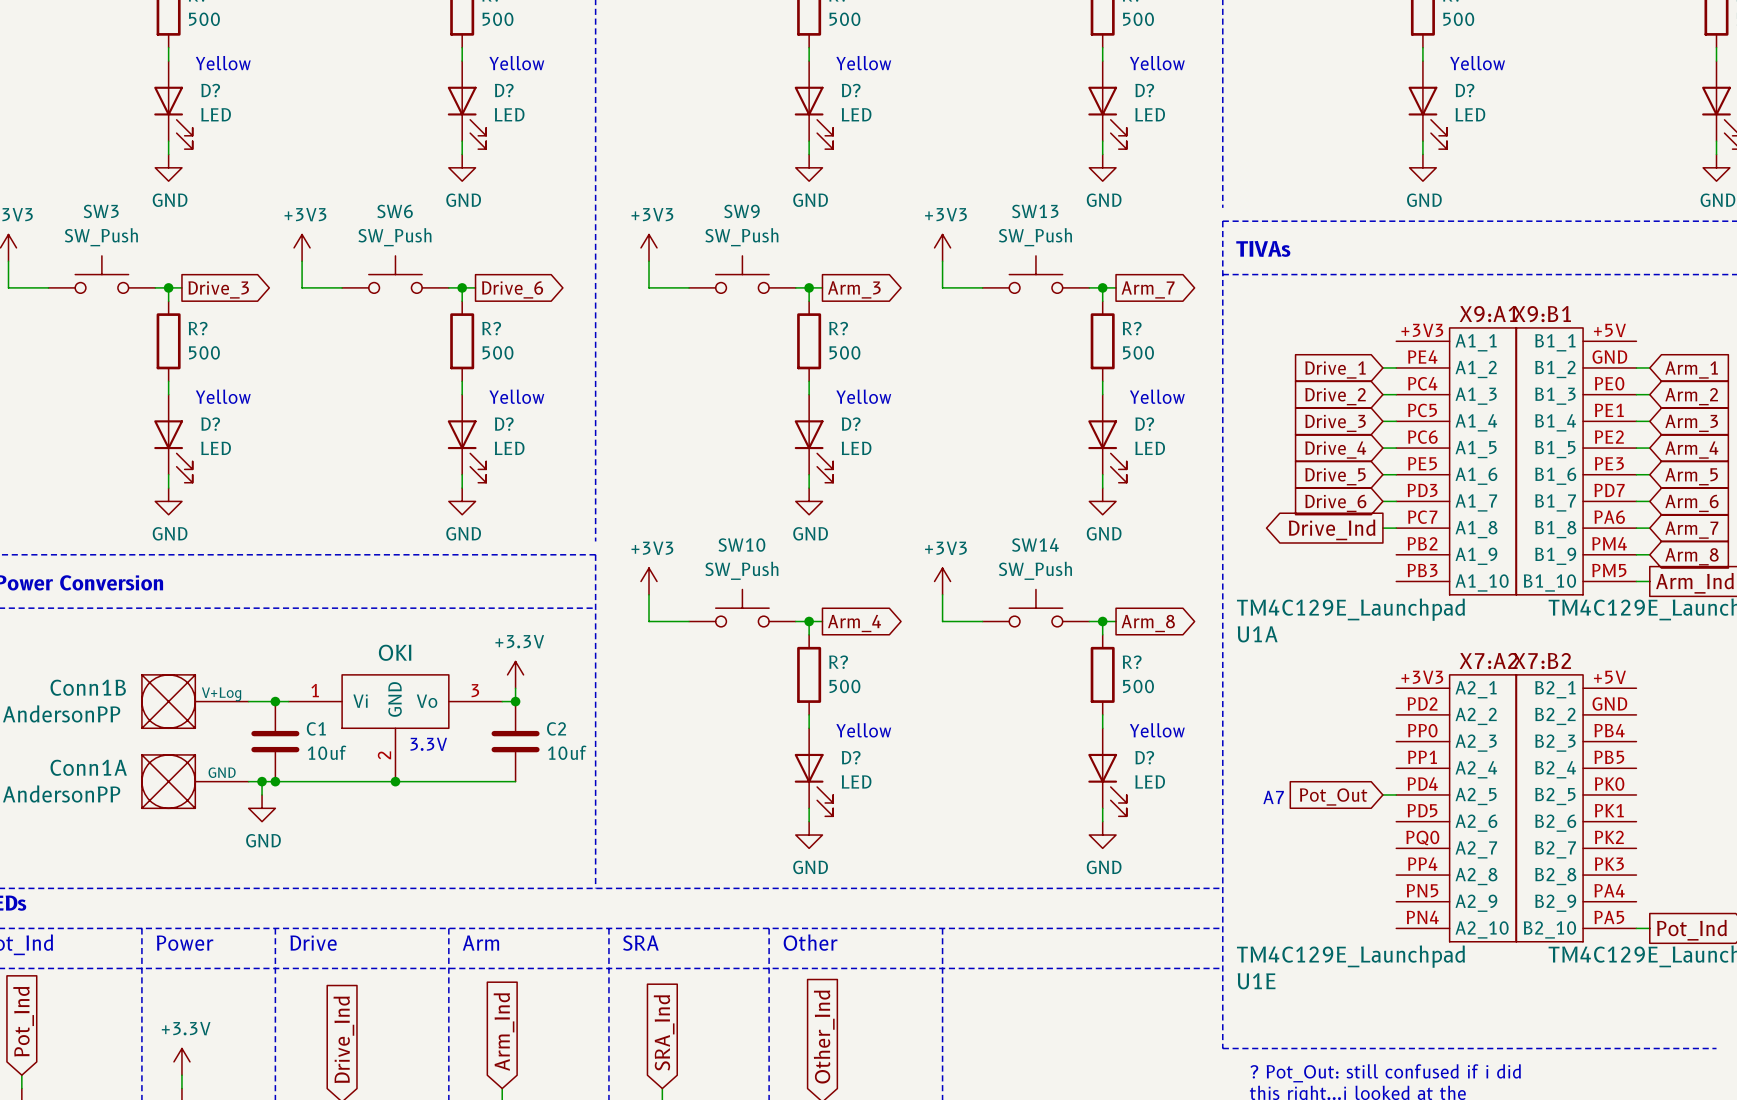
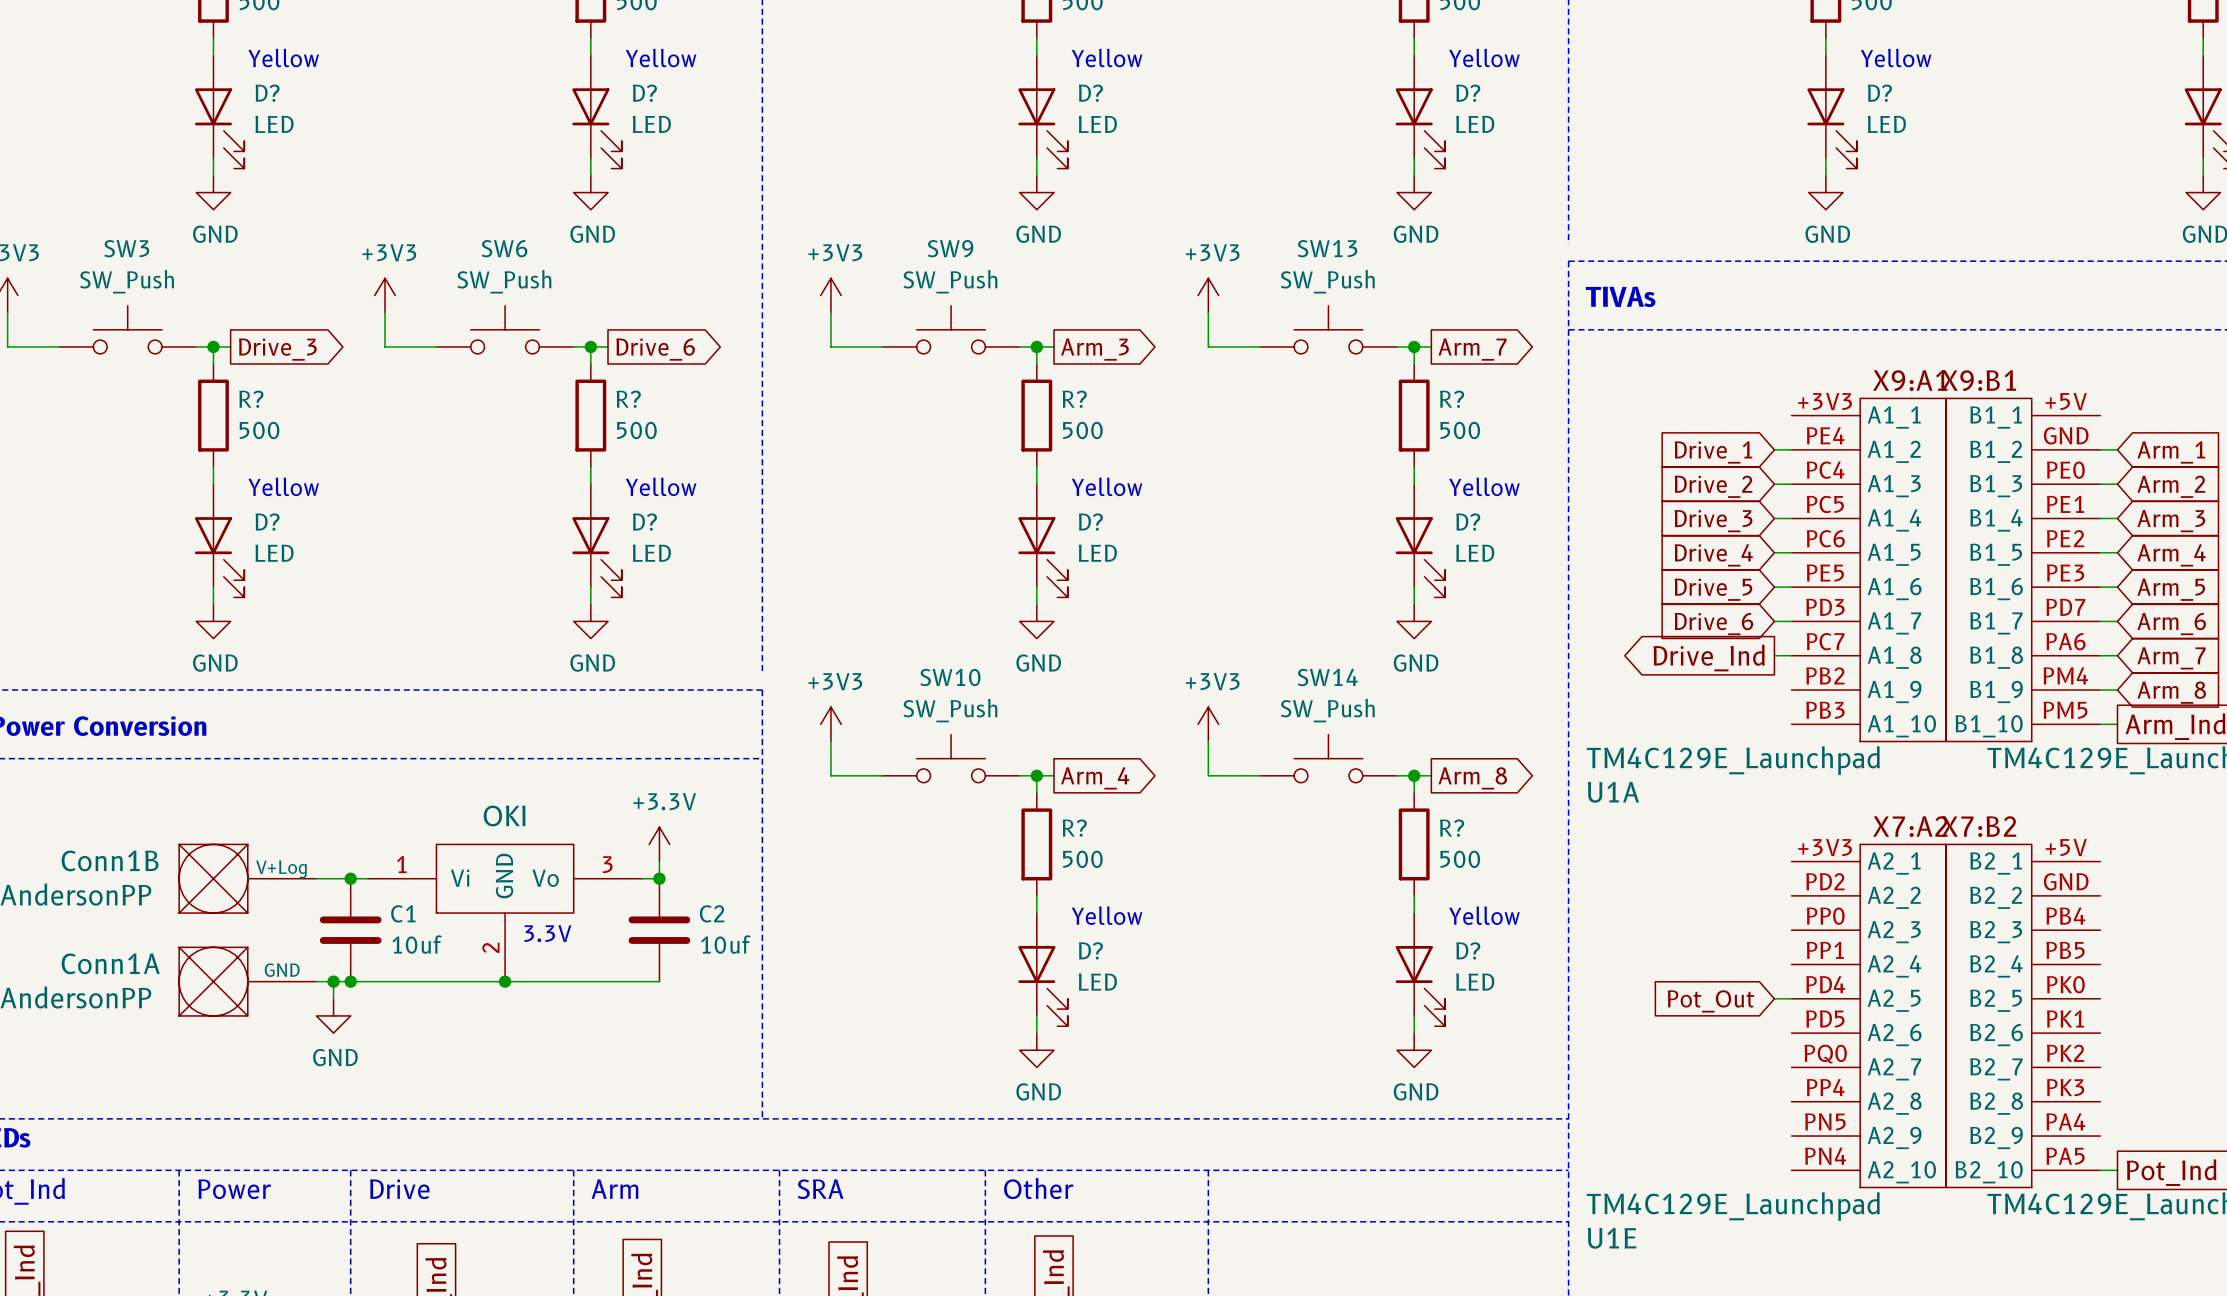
text: A7 (1273, 797) -> none

